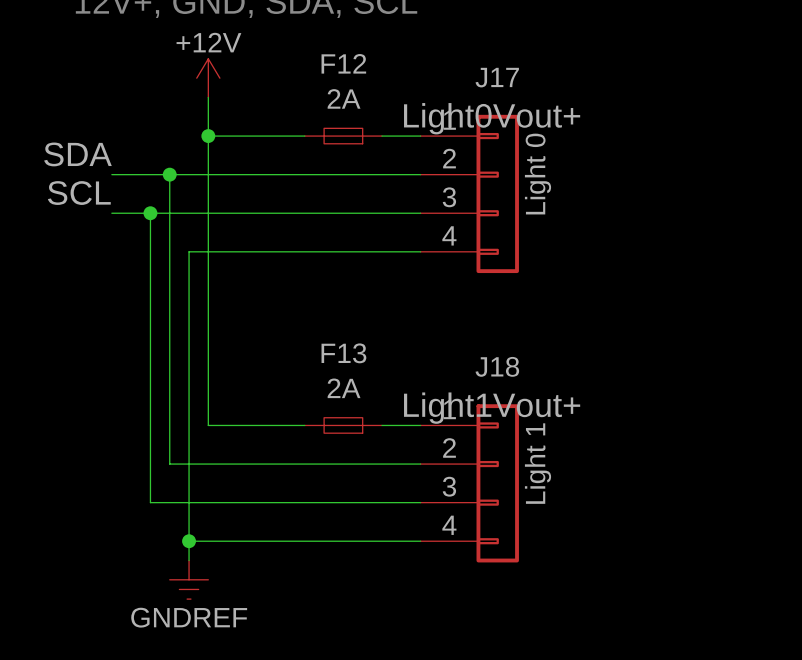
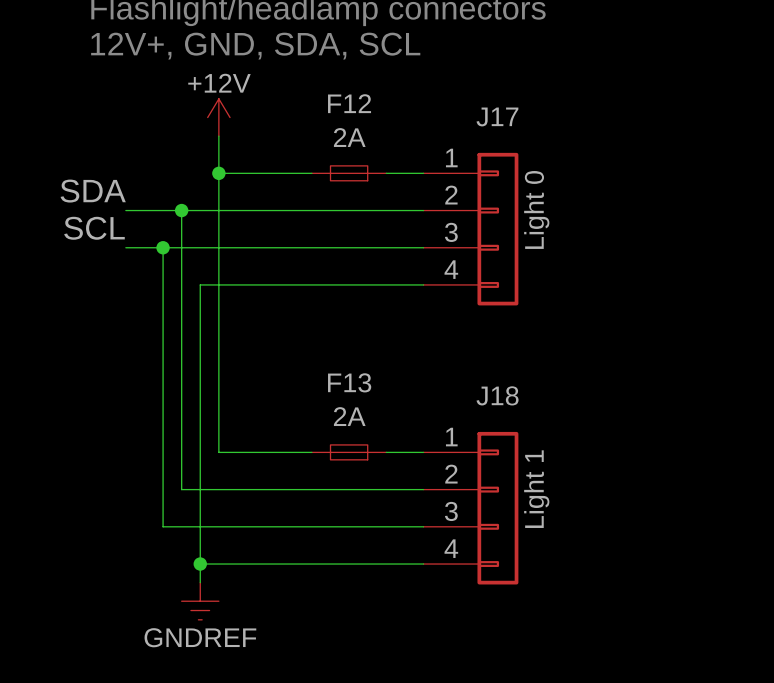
label: Light0Vout+ (492, 118) -> none
label: Light1Vout+ (492, 408) -> none

